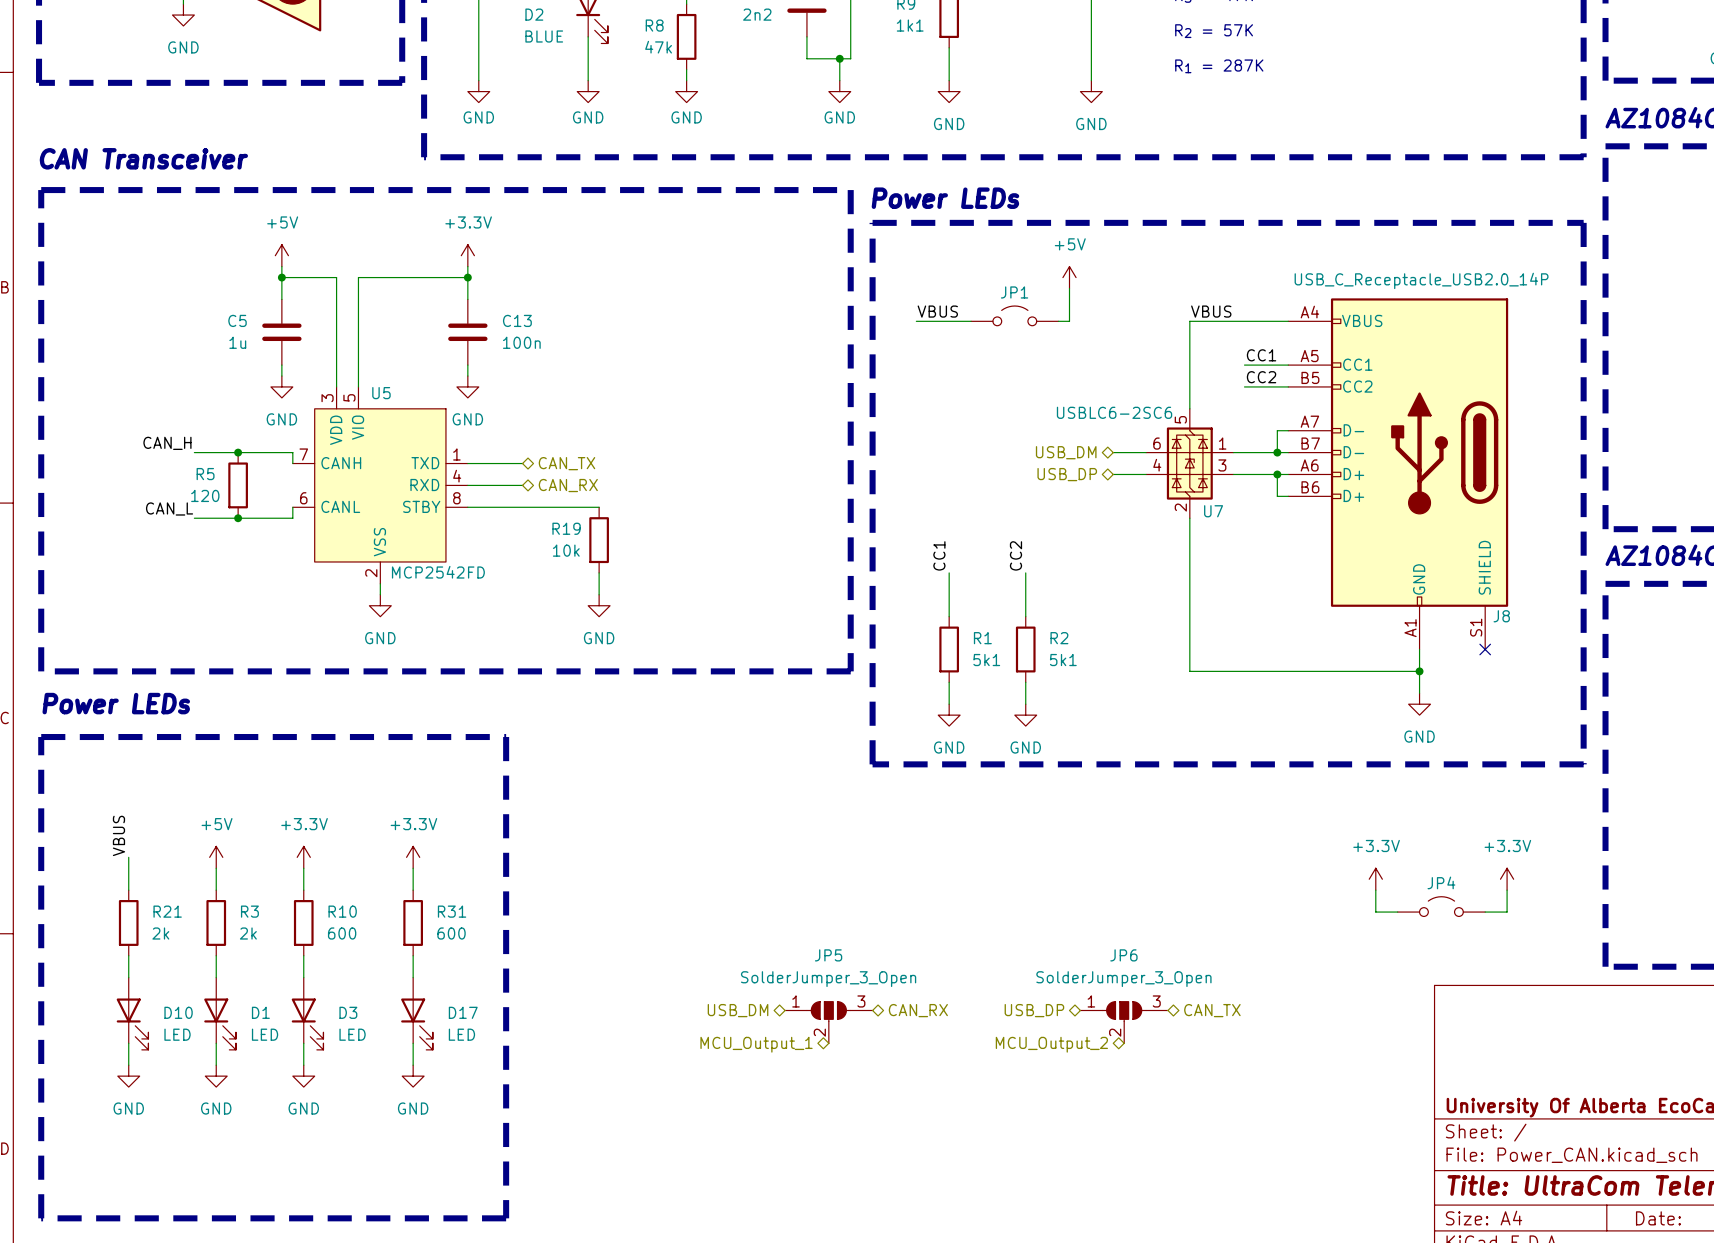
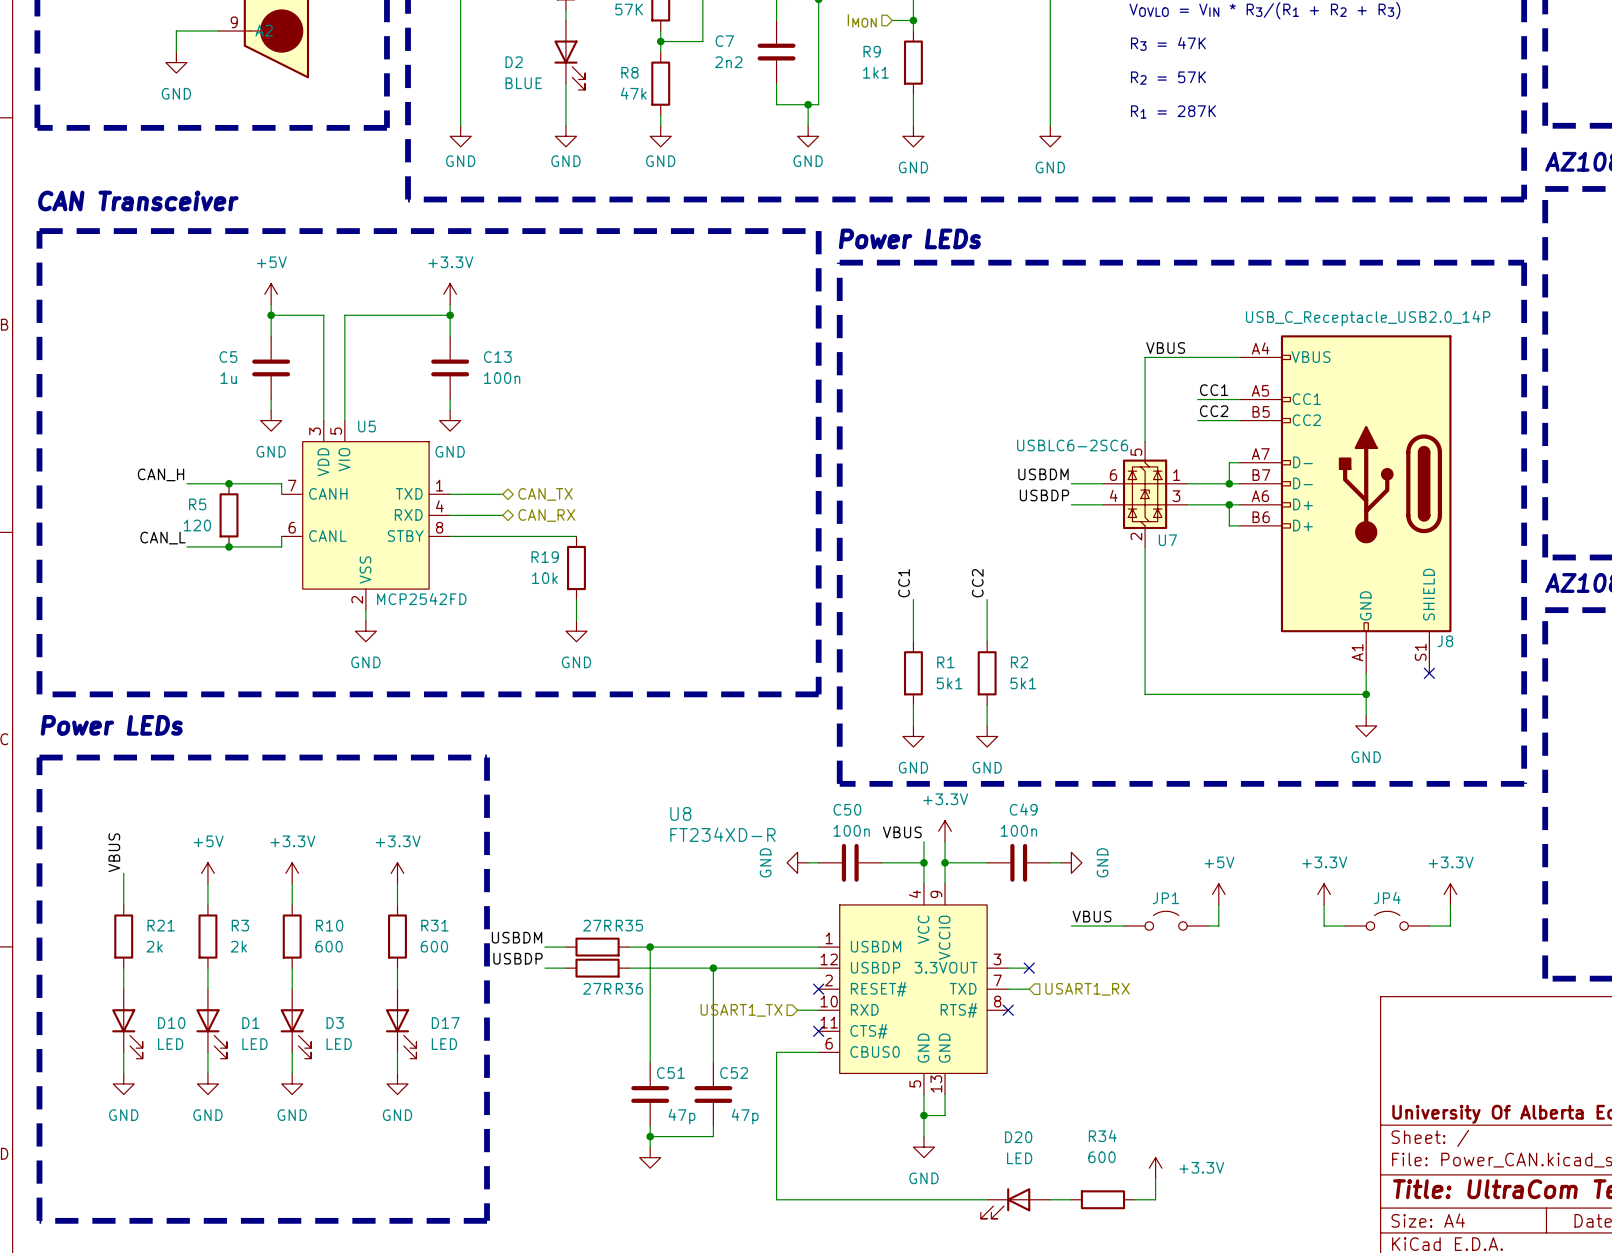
power symbol: +5V (1069, 277) -> none
wire: (1069, 288) (1069, 321) (1058, 321) -> none
label: VBUS (937, 311) -> none
JP1 position: (1014, 315) -> (1166, 920)
wire: (916, 321) (971, 321) -> none
label: none -> USBDM (1043, 474)
hierarchical label: USB_DM (1066, 452) -> none
label: none -> USBDP (1044, 495)
hierarchical label: USB_DP (1067, 474) -> none
power symbol: none -> +3.3V (945, 831)
label: none -> VBUS (902, 832)
wire: none -> (923, 841) (923, 883)
wire: none -> (945, 841) (945, 883)
power symbol: none -> GND (797, 862)
wire: none -> (808, 862) (818, 862)
C50: none -> 100n (850, 862)
wire: none -> (881, 862) (923, 862)
junction: none -> (923, 862)
wire: none -> (945, 862) (987, 862)
junction: none -> (945, 862)
C49: none -> 100n (1018, 862)
wire: none -> (1050, 862) (1060, 862)
power symbol: none -> GND (1071, 862)
power symbol: none -> +5V (1218, 894)
wire: none -> (1218, 904) (1218, 926) (1208, 926)
label: none -> VBUS (1092, 916)
wire: none -> (1071, 926) (1124, 926)
label: none -> USBDM (517, 937)
wire: none -> (544, 947) (565, 947)
R35: none -> 27R (597, 947)
wire: none -> (629, 947) (818, 947)
wire: none -> (650, 947) (650, 1062)
junction: none -> (650, 947)
label: none -> USBDP (518, 958)
wire: none -> (544, 968) (565, 968)
R36: none -> 27R (597, 968)
wire: none -> (629, 968) (818, 968)
wire: none -> (713, 968) (713, 1062)
junction: none -> (713, 968)
wire: none -> (1008, 968) (1029, 968)
no-connect mark: none -> (1029, 968)
no-connect mark: none -> (818, 989)
U8: none -> FT234XD-R (913, 989)
wire: none -> (1008, 989) (1029, 989)
hierarchical label: none -> USART1_RX (1087, 989)
hierarchical label: none -> USART1_TX (741, 1010)
wire: none -> (797, 1010) (818, 1010)
no-connect mark: none -> (1008, 1010)
hierarchical label: USB_DM (738, 1010) -> none
hierarchical label: CAN_RX (918, 1010) -> none
hierarchical label: USB_DP (1034, 1010) -> none
hierarchical label: CAN_TX (1212, 1010) -> none
no-connect mark: none -> (818, 1031)
JP5: SolderJumper_3_Open (828, 1022) -> none
JP6: SolderJumper_3_Open (1124, 1022) -> none
wire: none -> (818, 1052) (776, 1052) (776, 1199) (987, 1199)
hierarchical label: MCU_Output_1 (756, 1044) -> none
hierarchical label: MCU_Output_2 (1051, 1044) -> none
C51: none -> 47p (650, 1094)
C52: none -> 47p (713, 1094)
wire: none -> (923, 1094) (923, 1136)
wire: none -> (945, 1094) (945, 1115) (923, 1115)
junction: none -> (923, 1115)
wire: none -> (650, 1126) (650, 1147)
wire: none -> (713, 1126) (713, 1136) (650, 1136)
junction: none -> (650, 1136)
power symbol: none -> GND (923, 1147)
power symbol: none -> (650, 1157)
power symbol: none -> +3.3V (1155, 1168)
wire: none -> (1155, 1178) (1155, 1199) (1134, 1199)
wire: none -> (1050, 1199) (1071, 1199)
R34: none -> 600 (1102, 1199)
D20: none -> LED (1015, 1203)

